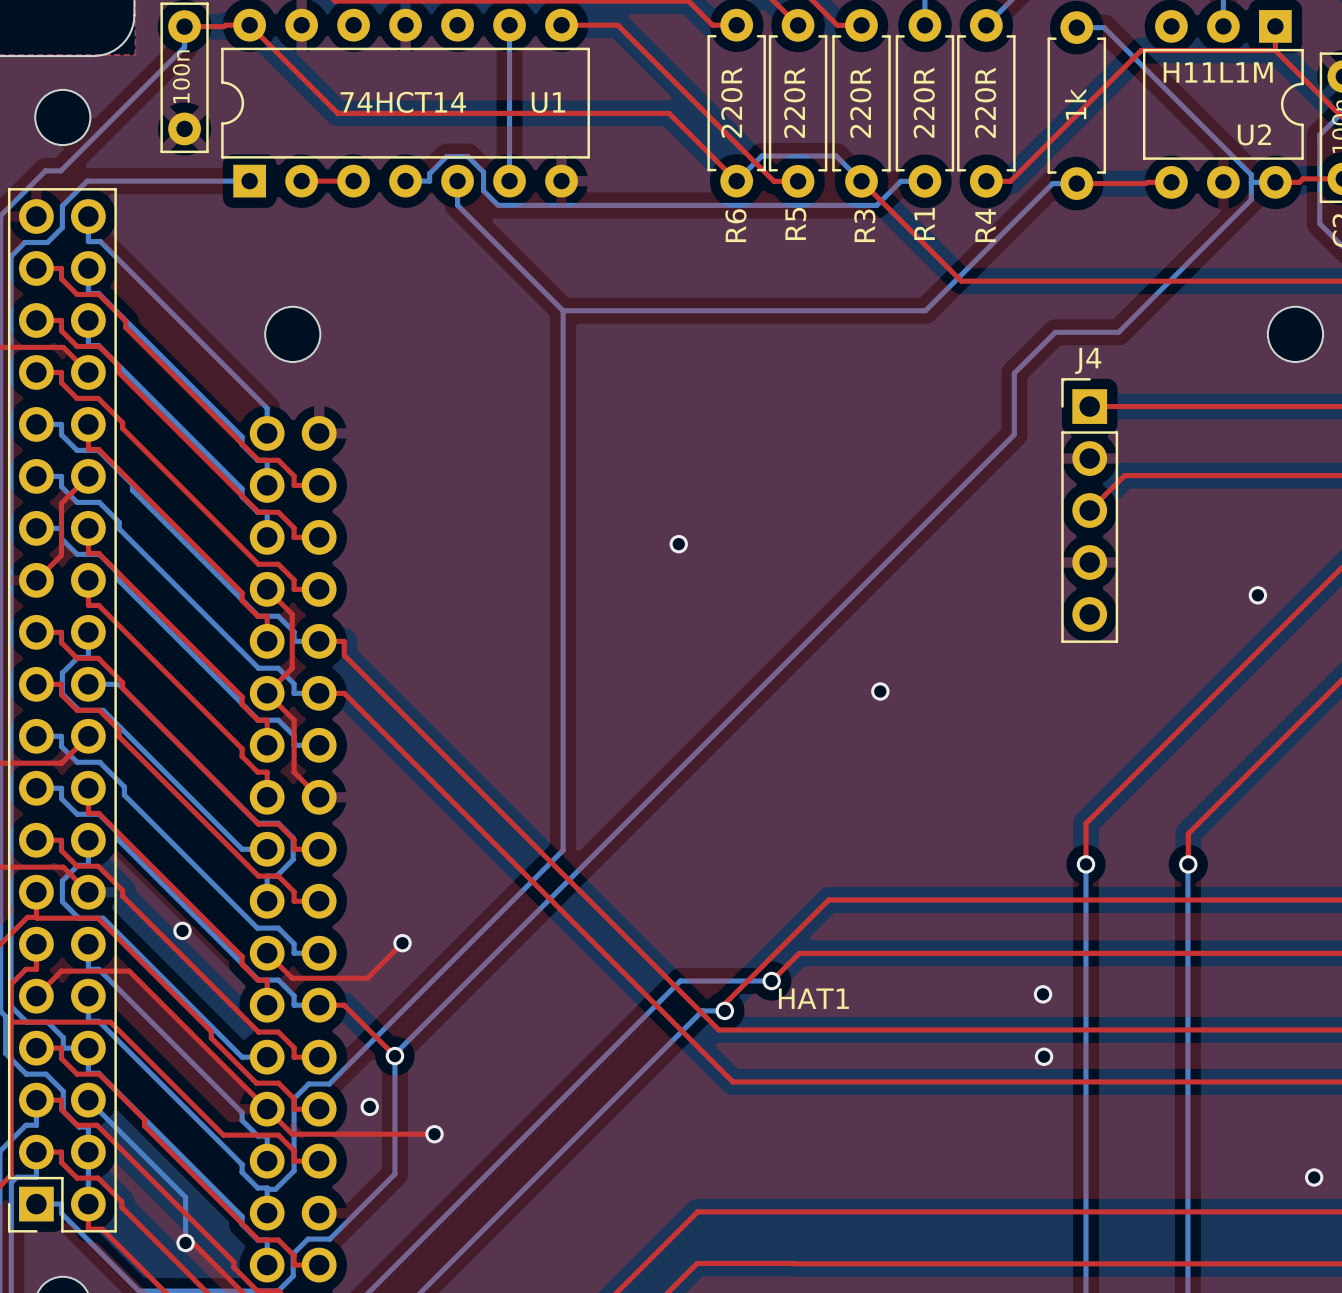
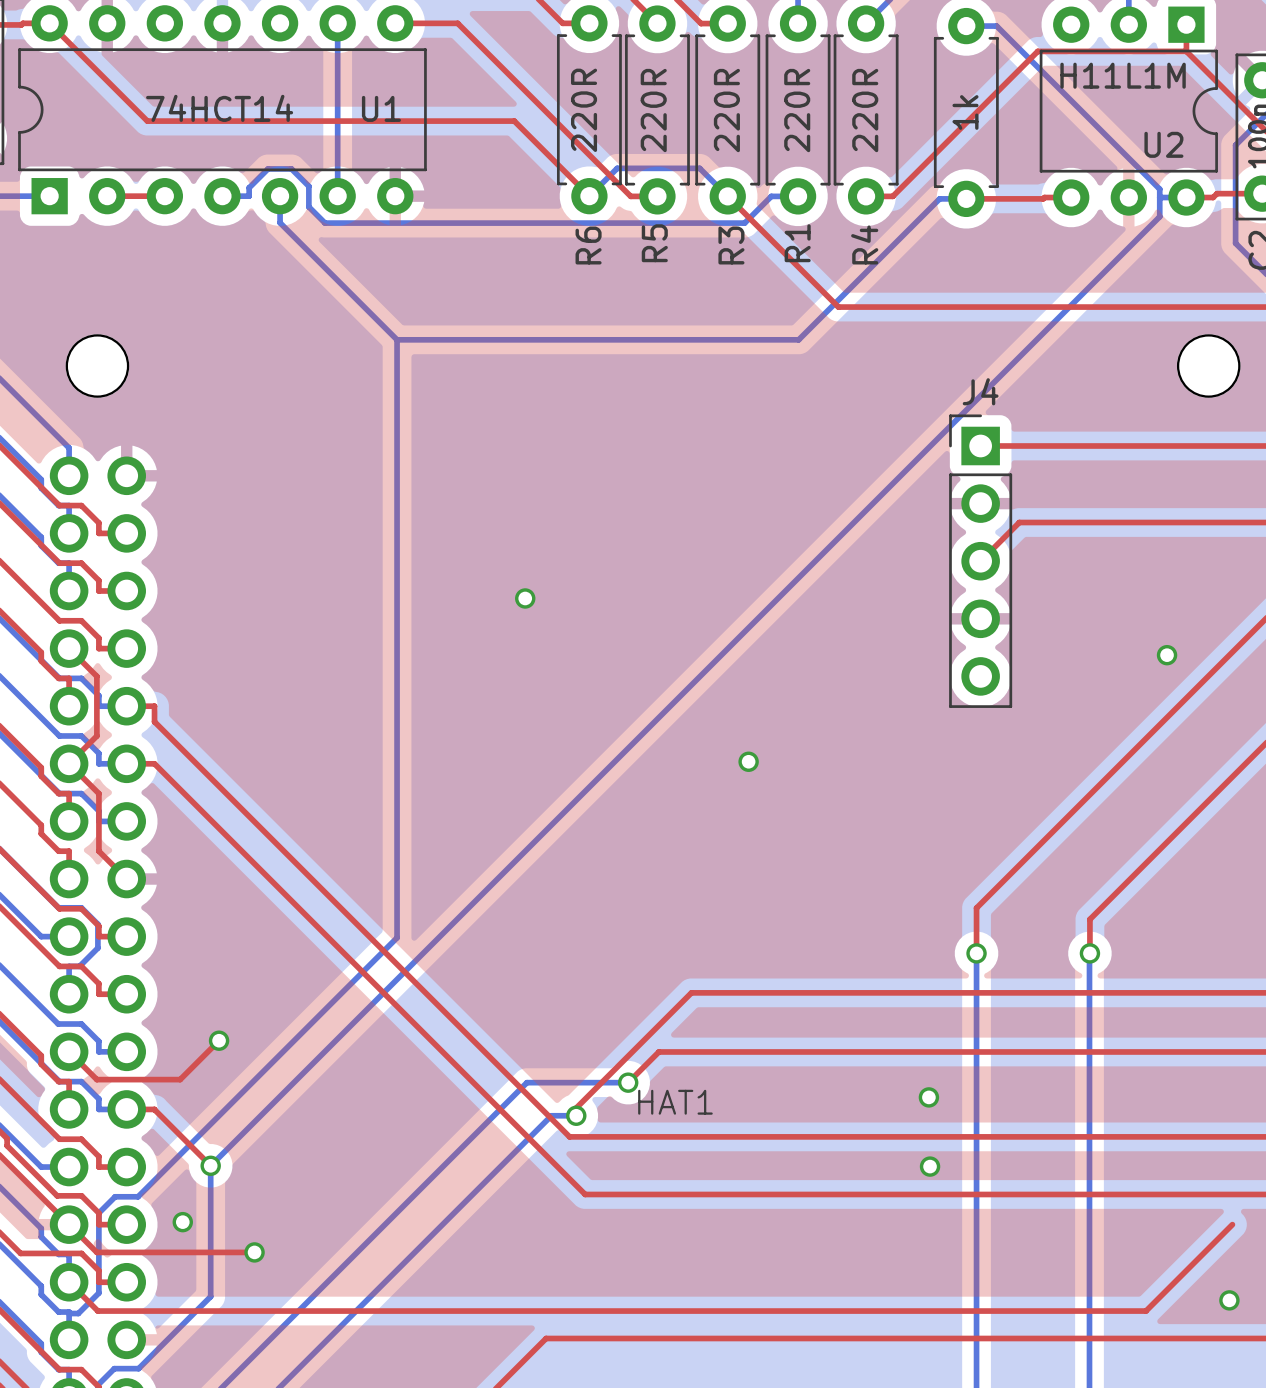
bottom track: (1118, 332) (1055, 332) (1014, 373) (1014, 434) (394, 1056) -> (1012, 363) (210, 1165)
top track: none -> (1232, 1224) (1145, 1311) (97, 1311) (69, 1282)

